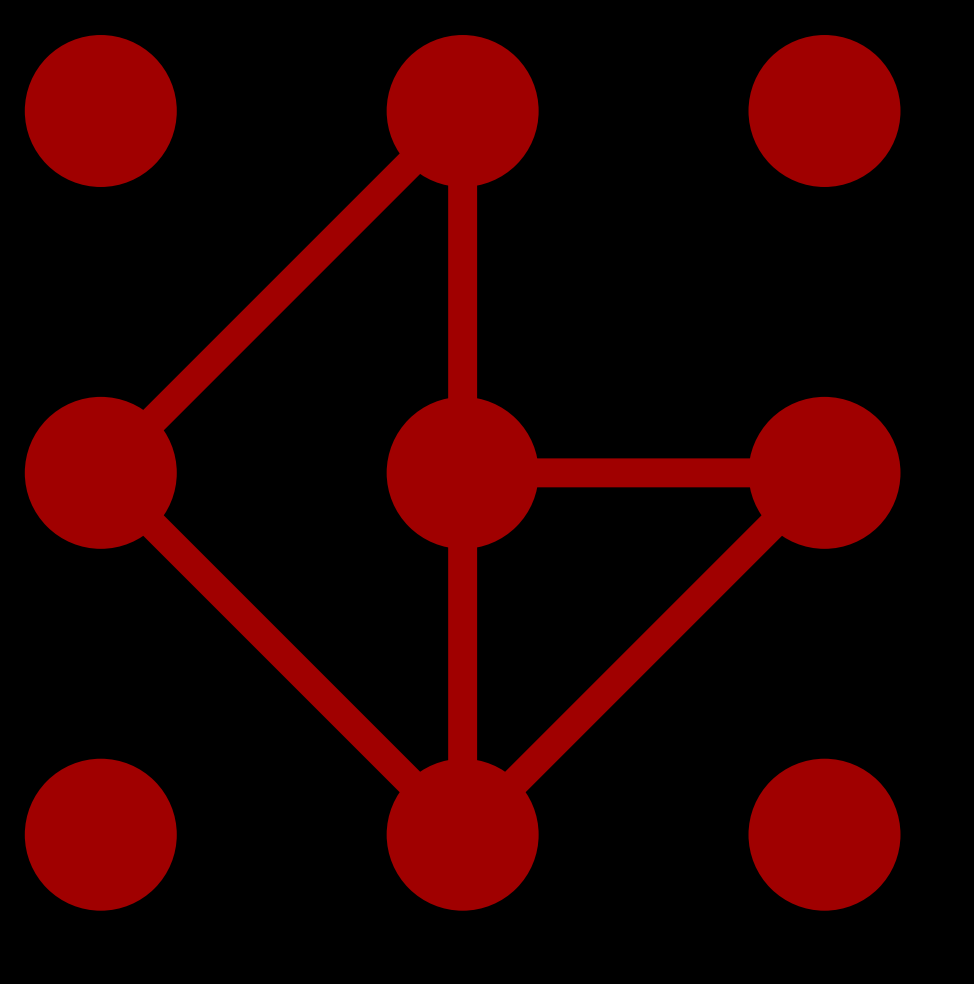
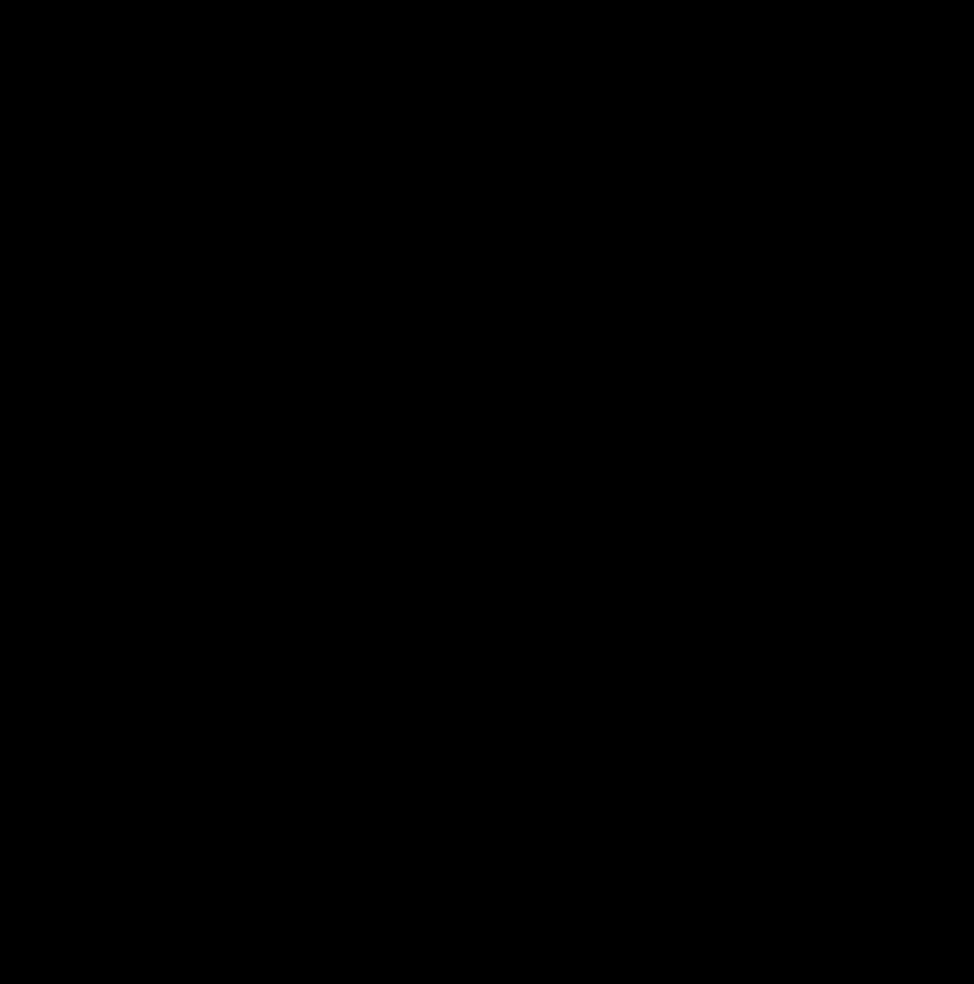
drawing: [24, 35, 177, 187] -> none
drawing: [386, 35, 539, 187] -> none
drawing: [748, 35, 901, 187] -> none
drawing: [24, 396, 177, 549] -> none
drawing: [386, 396, 539, 549] -> none
drawing: [748, 396, 901, 549] -> none
top track: (462, 472) (824, 472) (462, 834) -> none
drawing: [24, 758, 177, 911] -> none
drawing: [386, 758, 539, 911] -> none
drawing: [748, 758, 901, 911] -> none
top track: (462, 834) (462, 111) (100, 472) (462, 834) -> none

